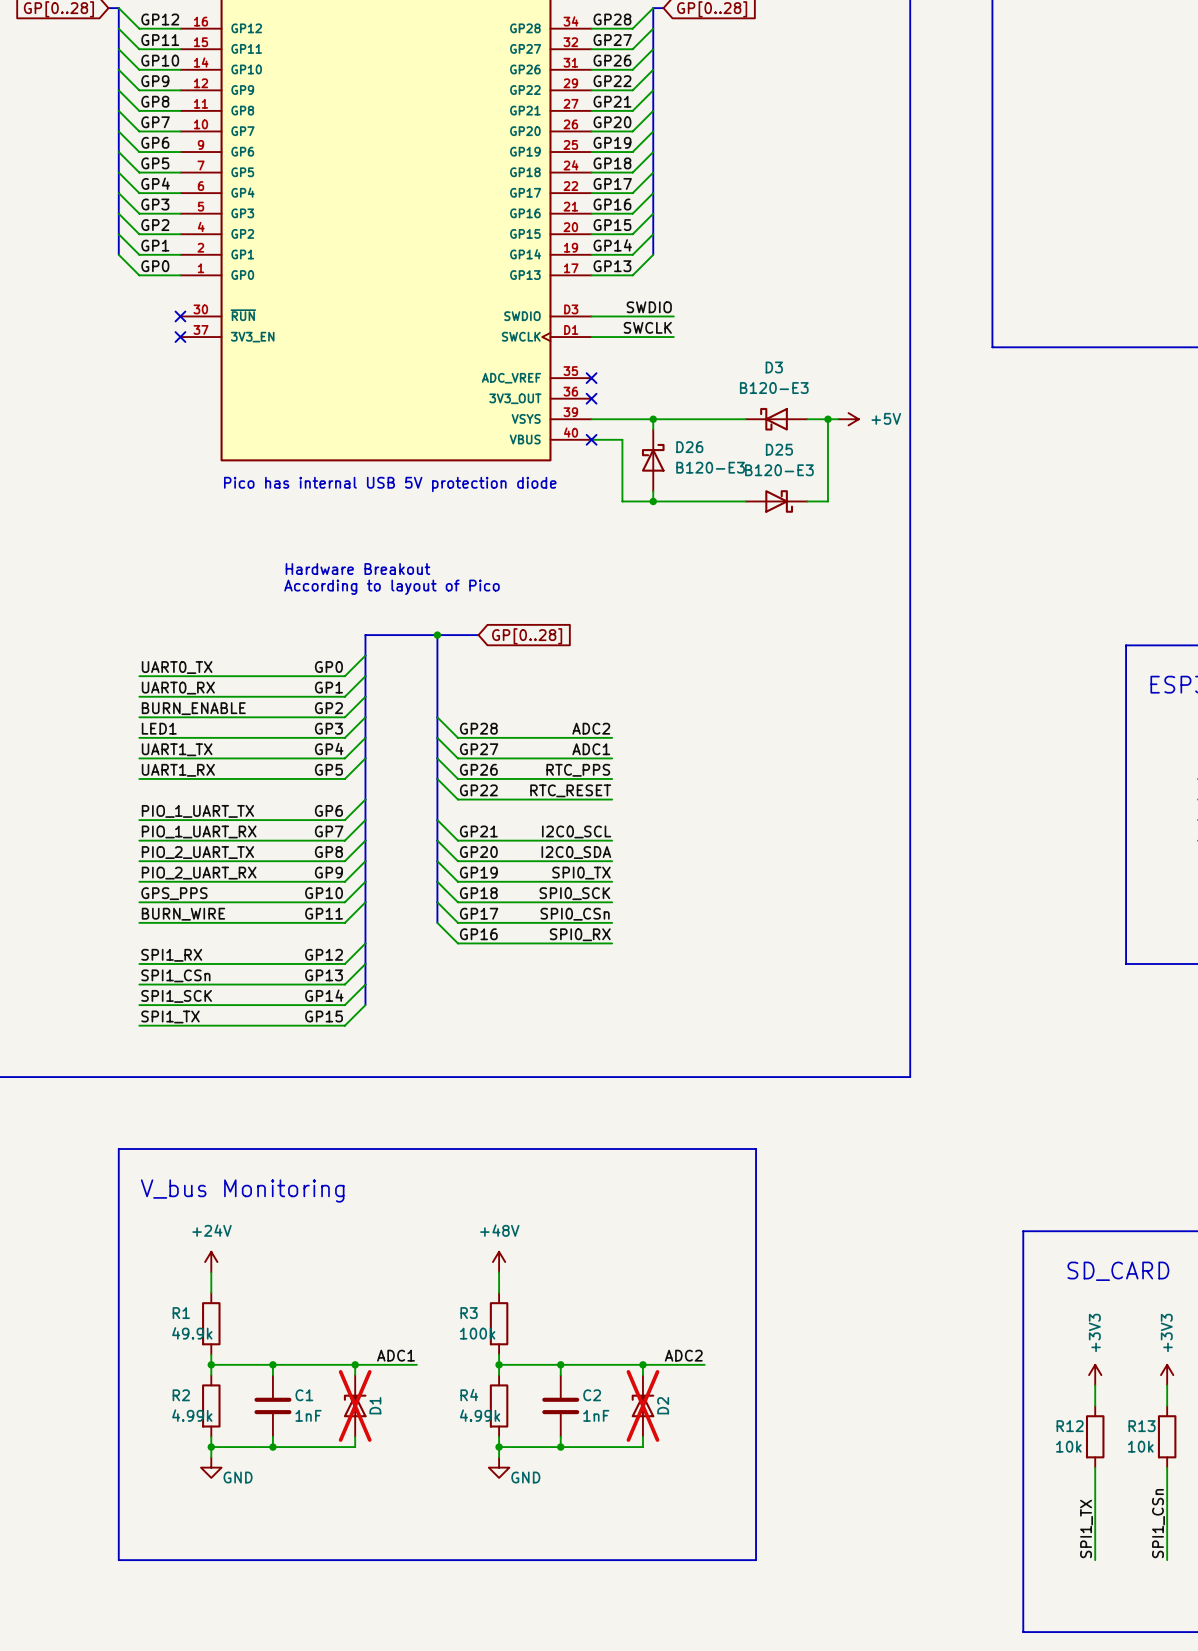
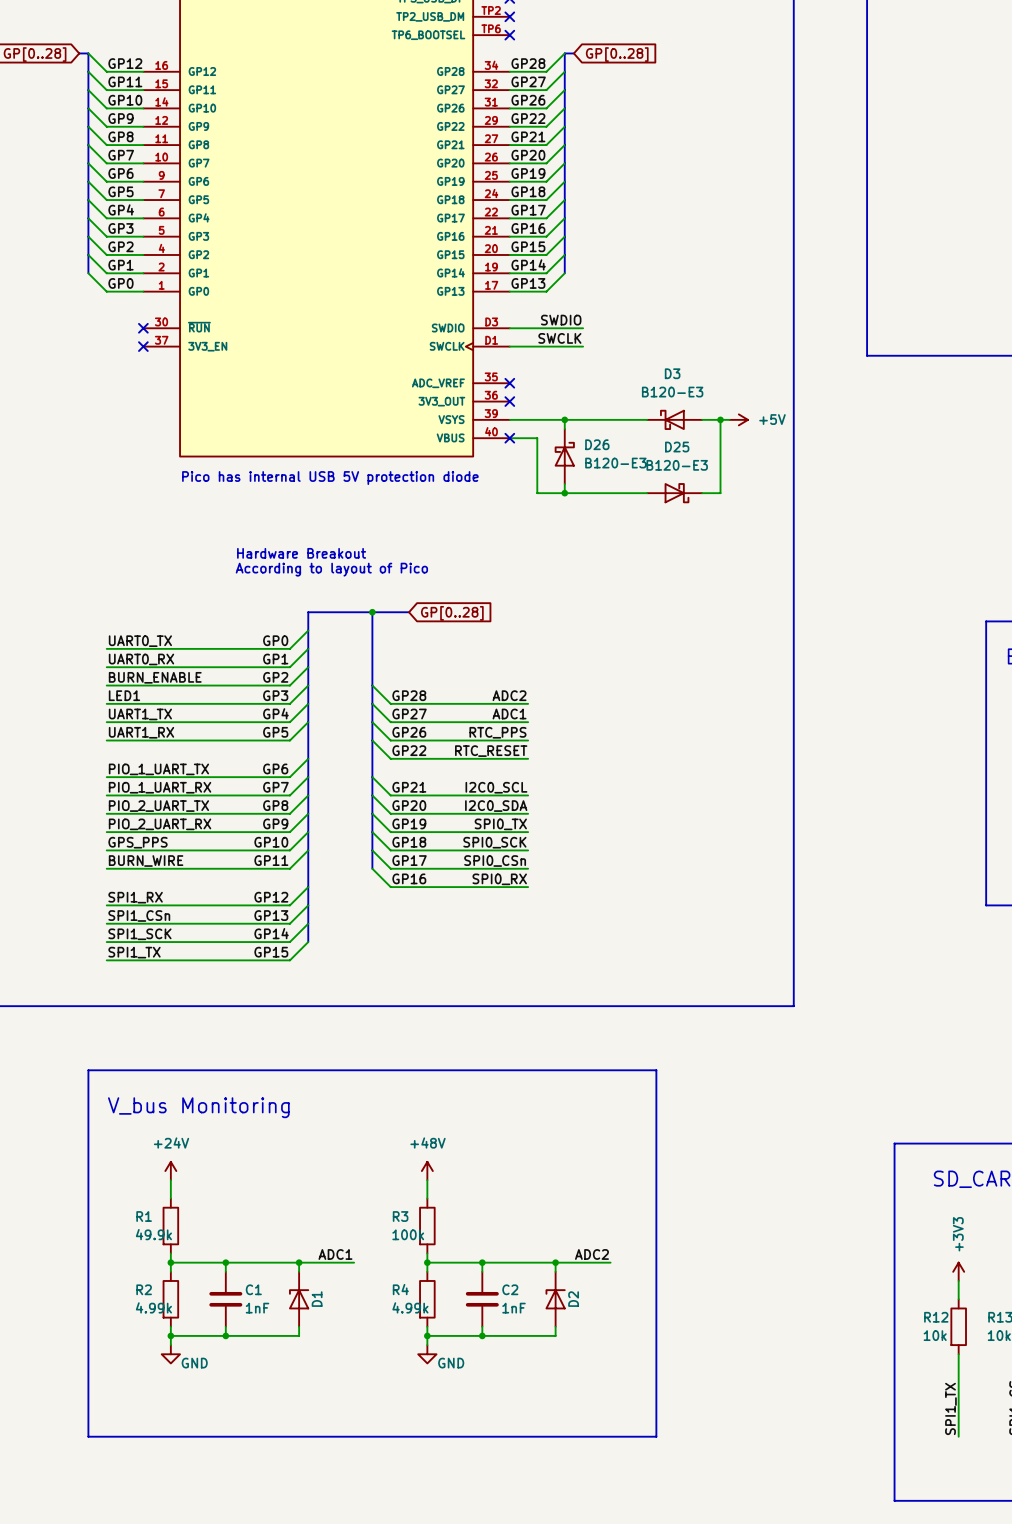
D1 do-not-place cross: (355, 1405) -> none
D2 do-not-place cross: (642, 1405) -> none

